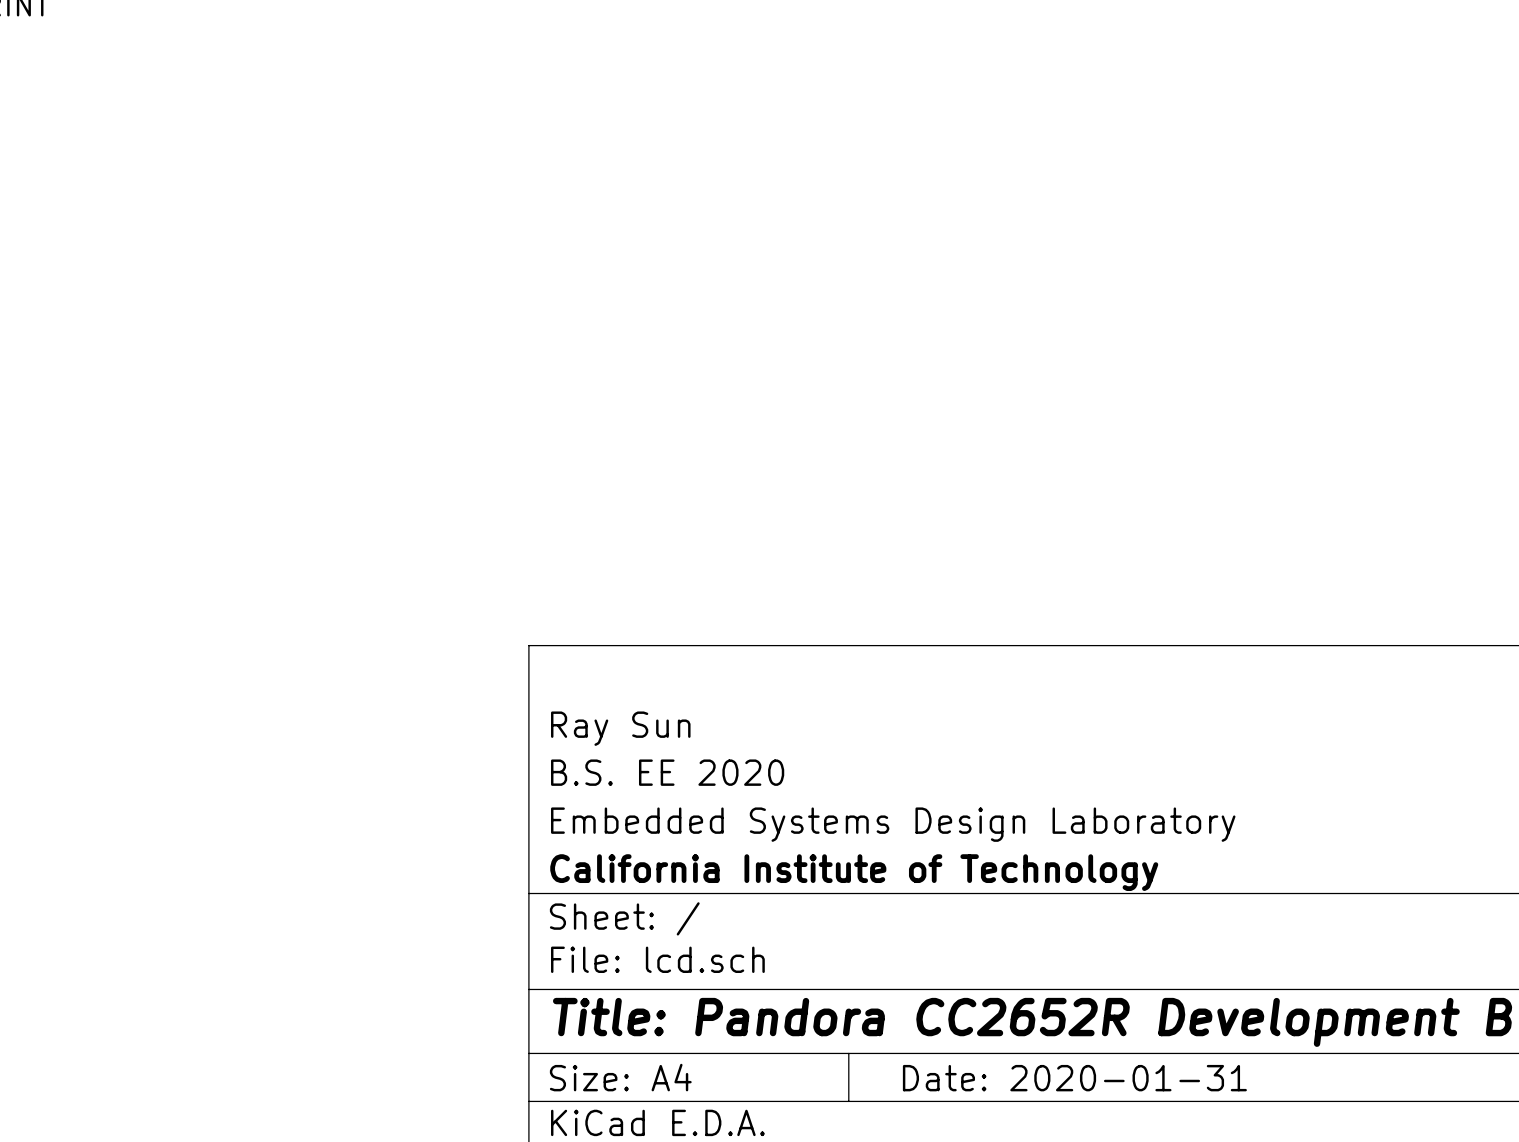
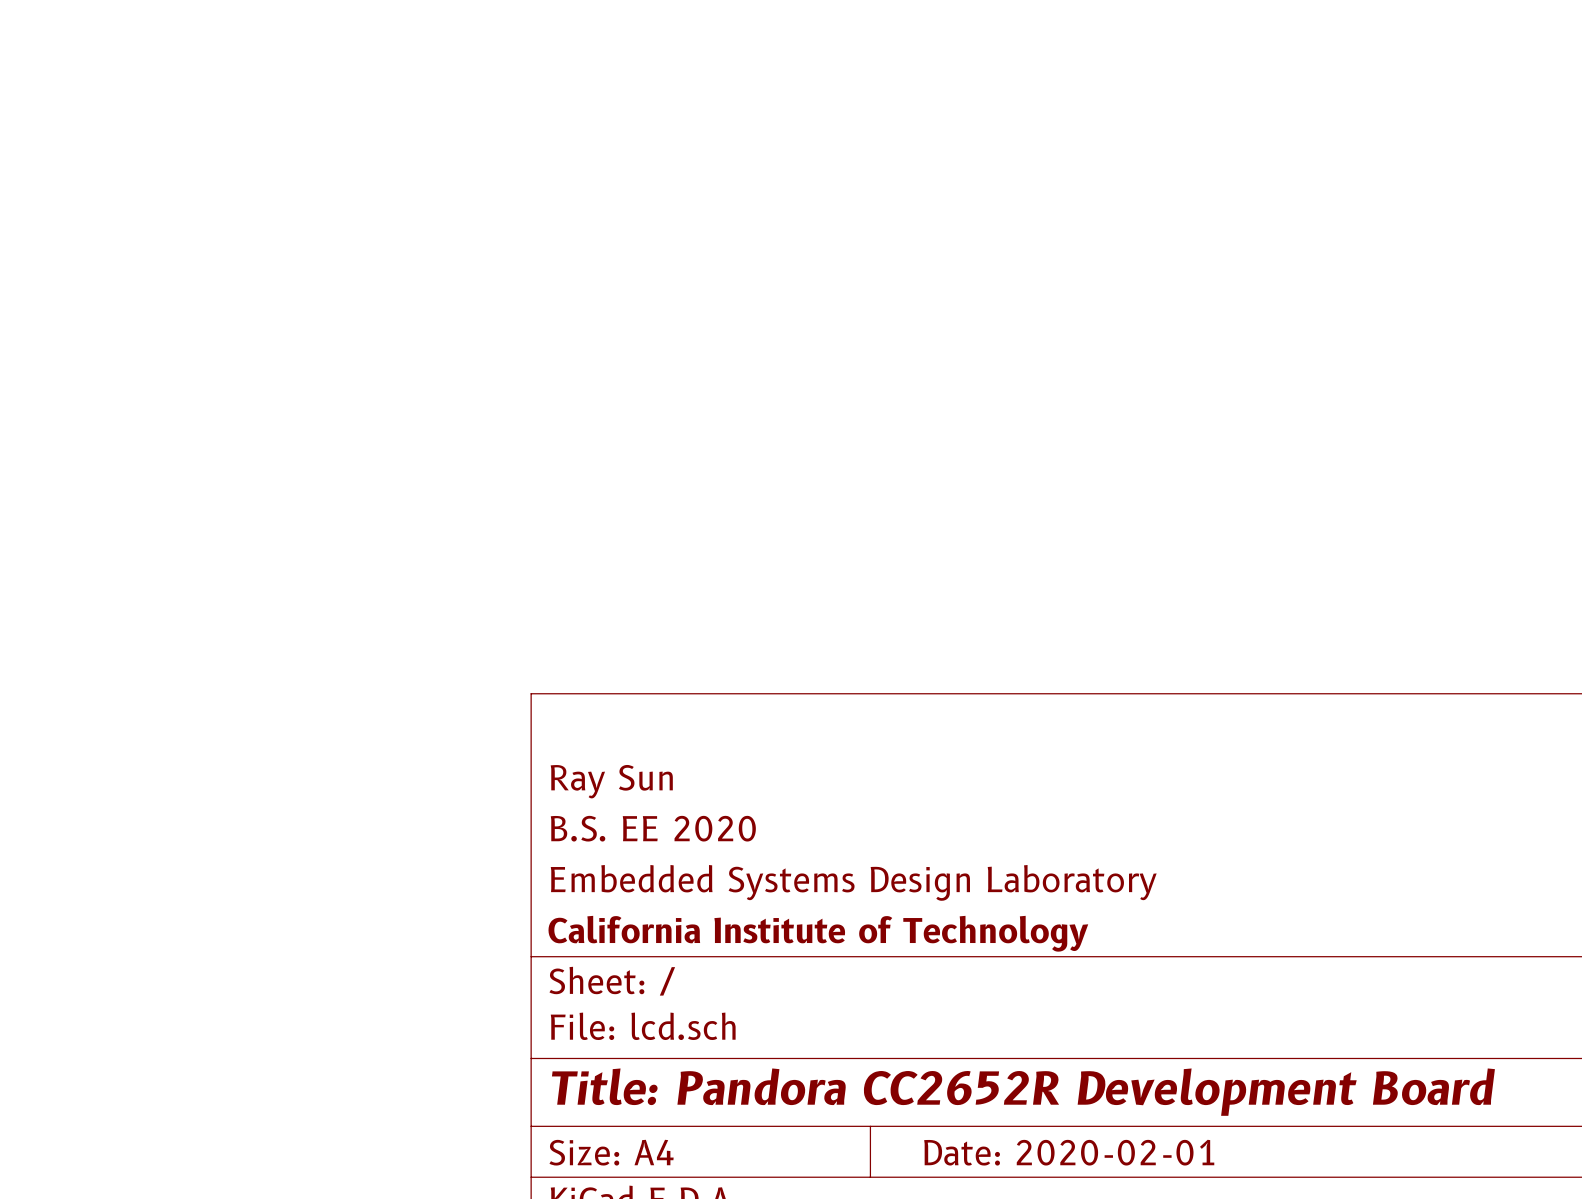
title block: Date: 2020-01-31 (1074, 1078) -> Date: 2020-02-01 (1069, 1152)

